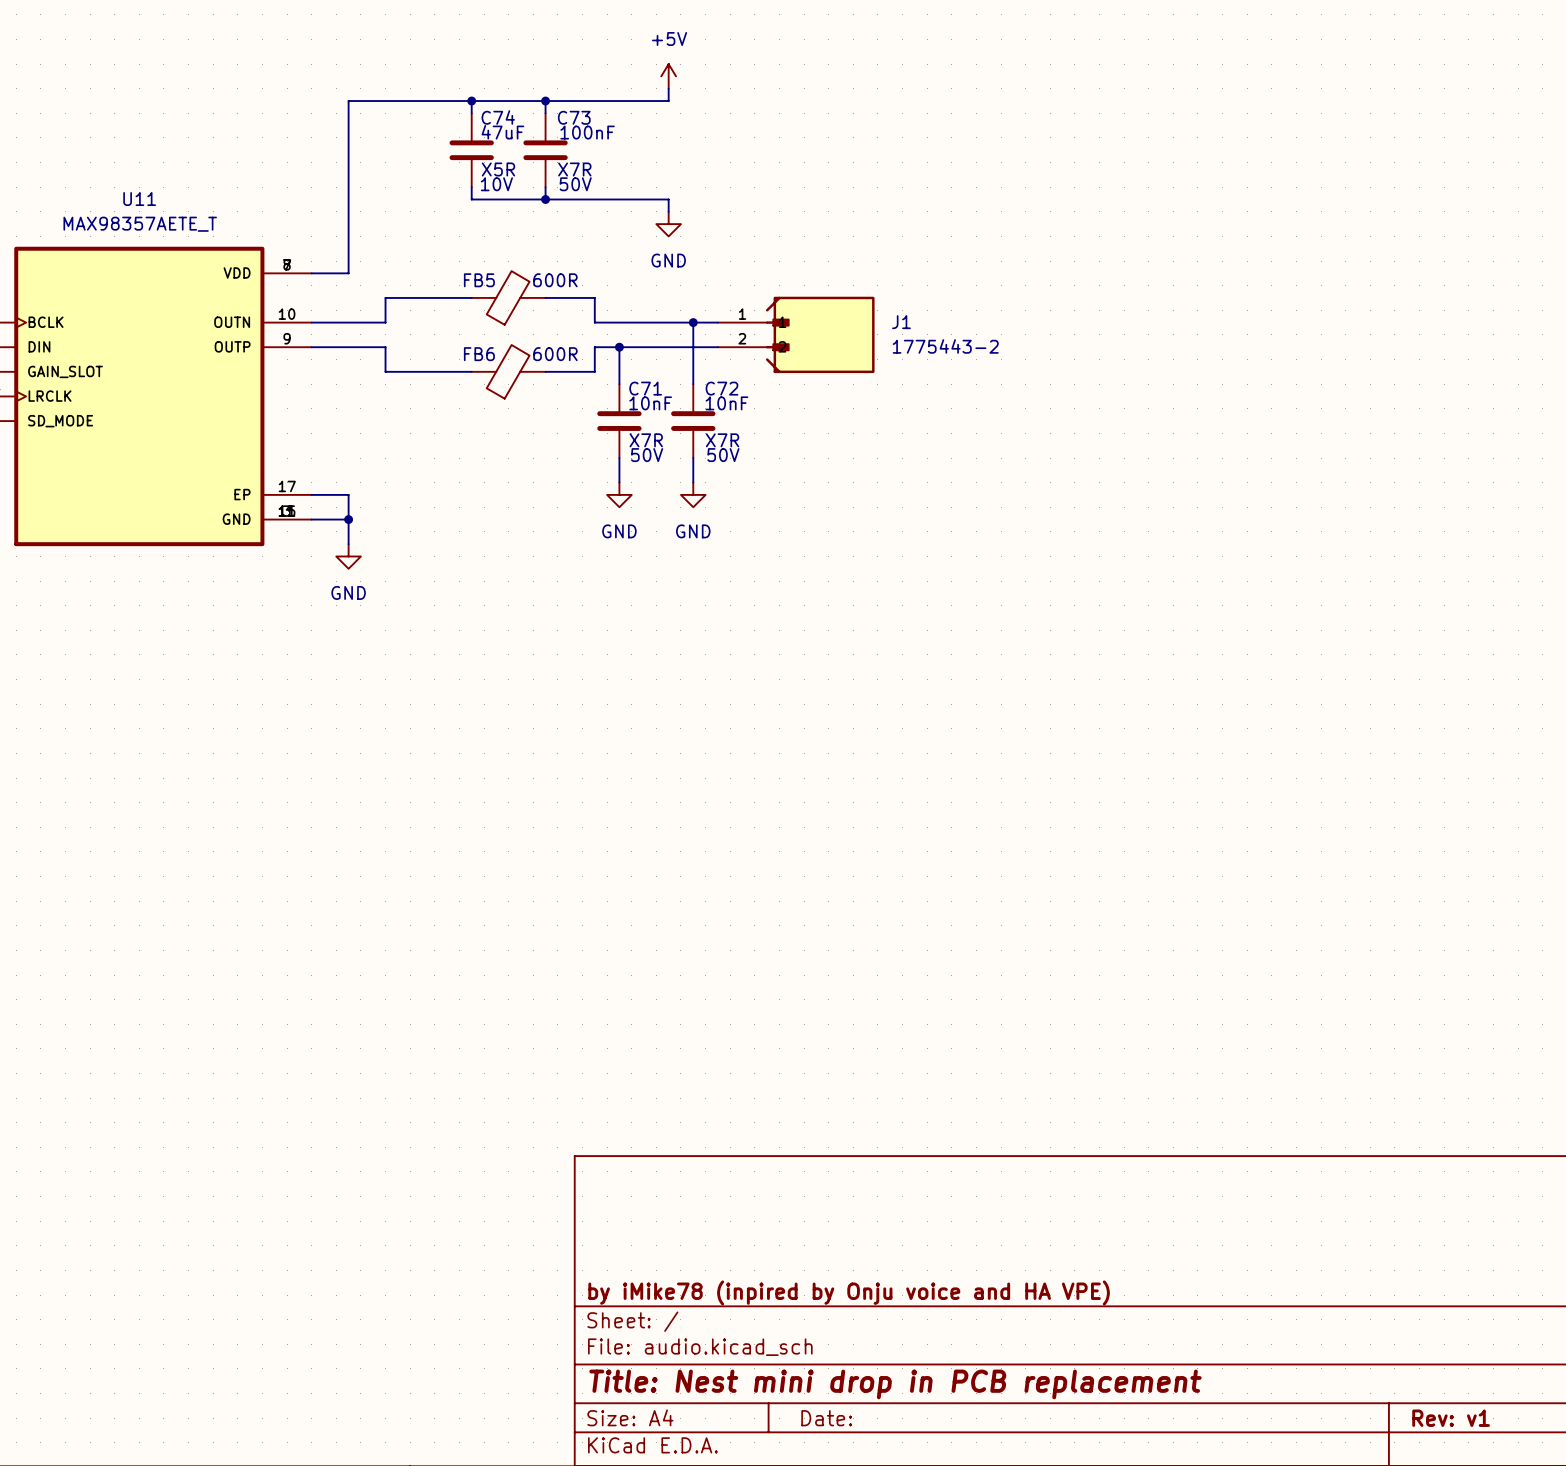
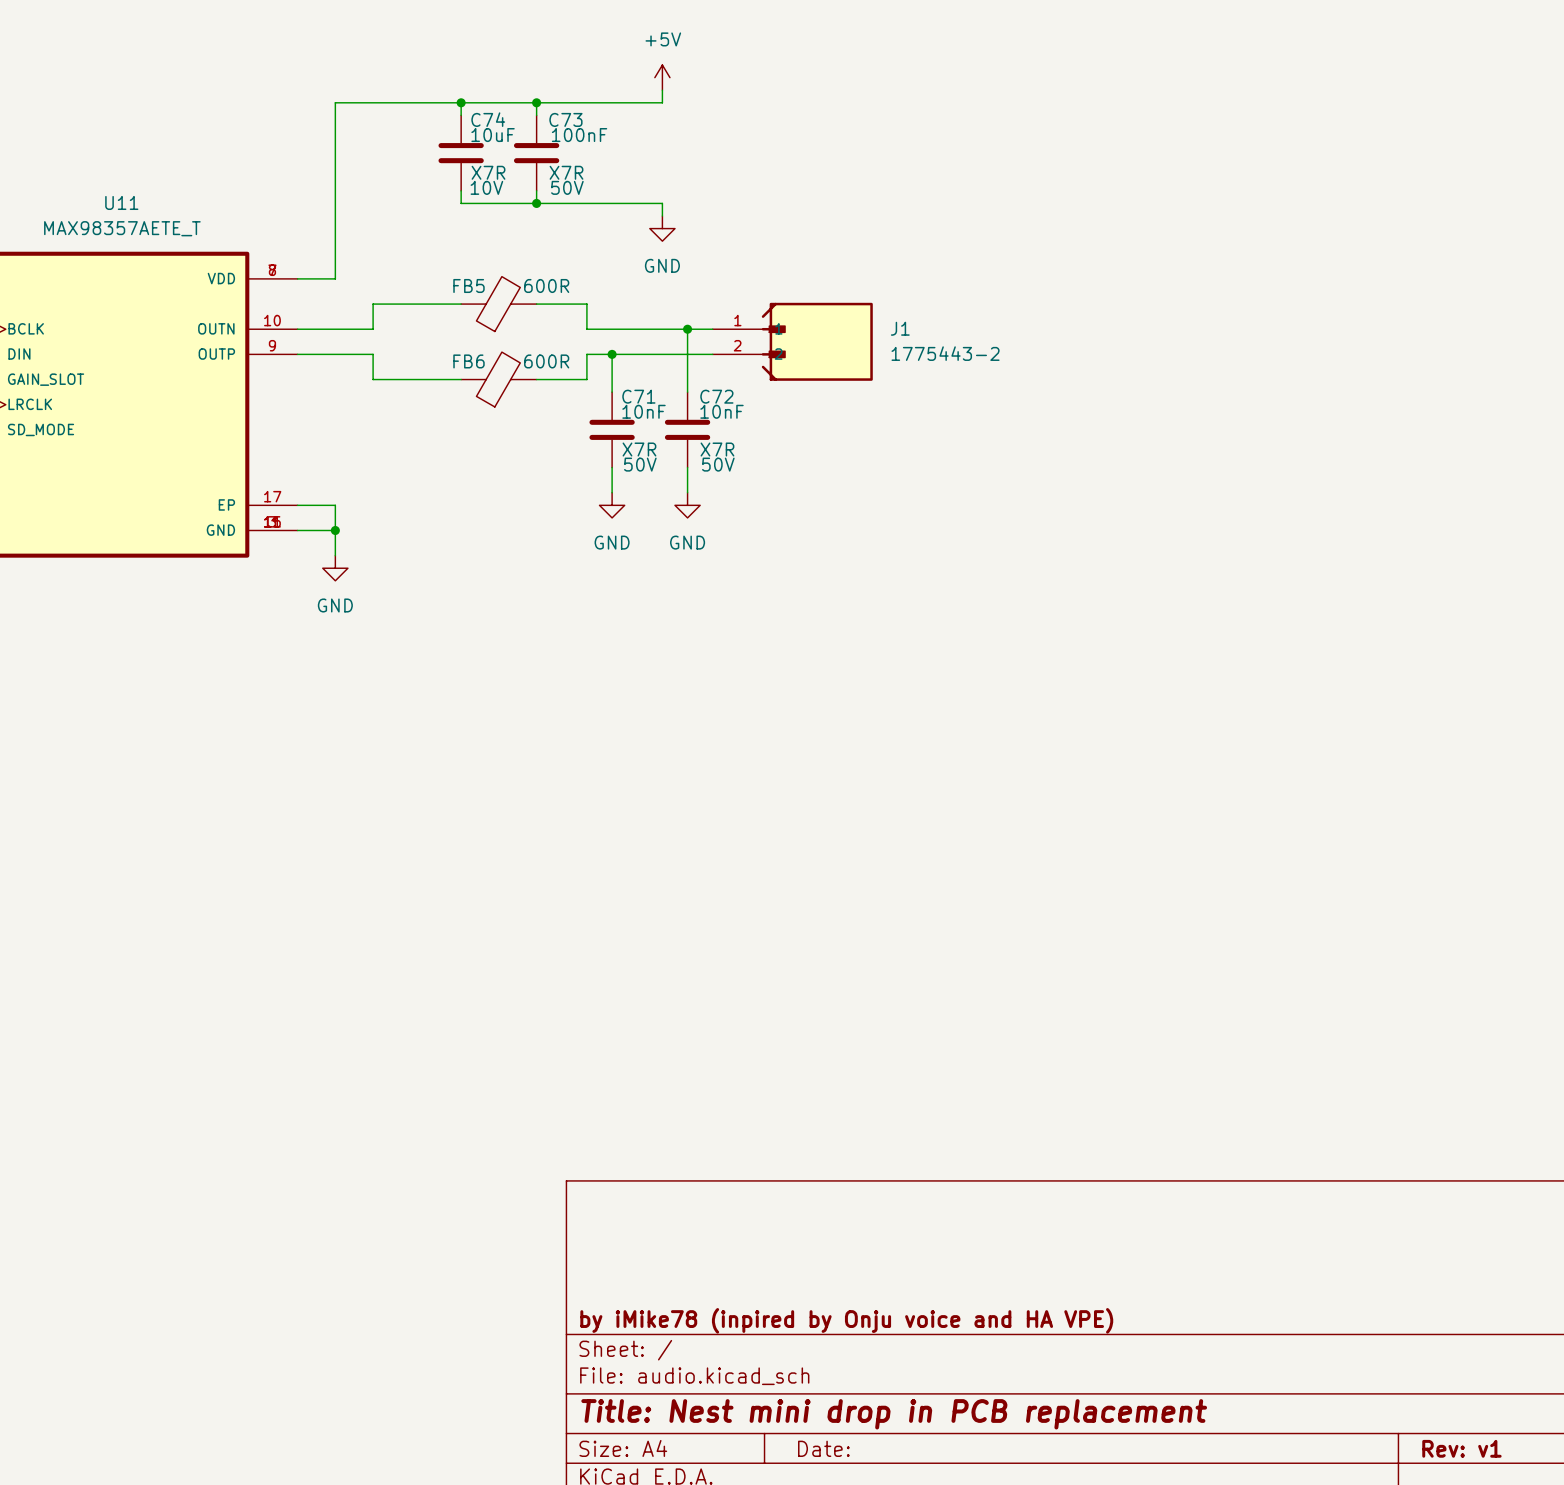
C74 value: 47uF (502, 132) -> 10uF (493, 135)
C74 text: X5R (498, 169) -> X7R (488, 172)

